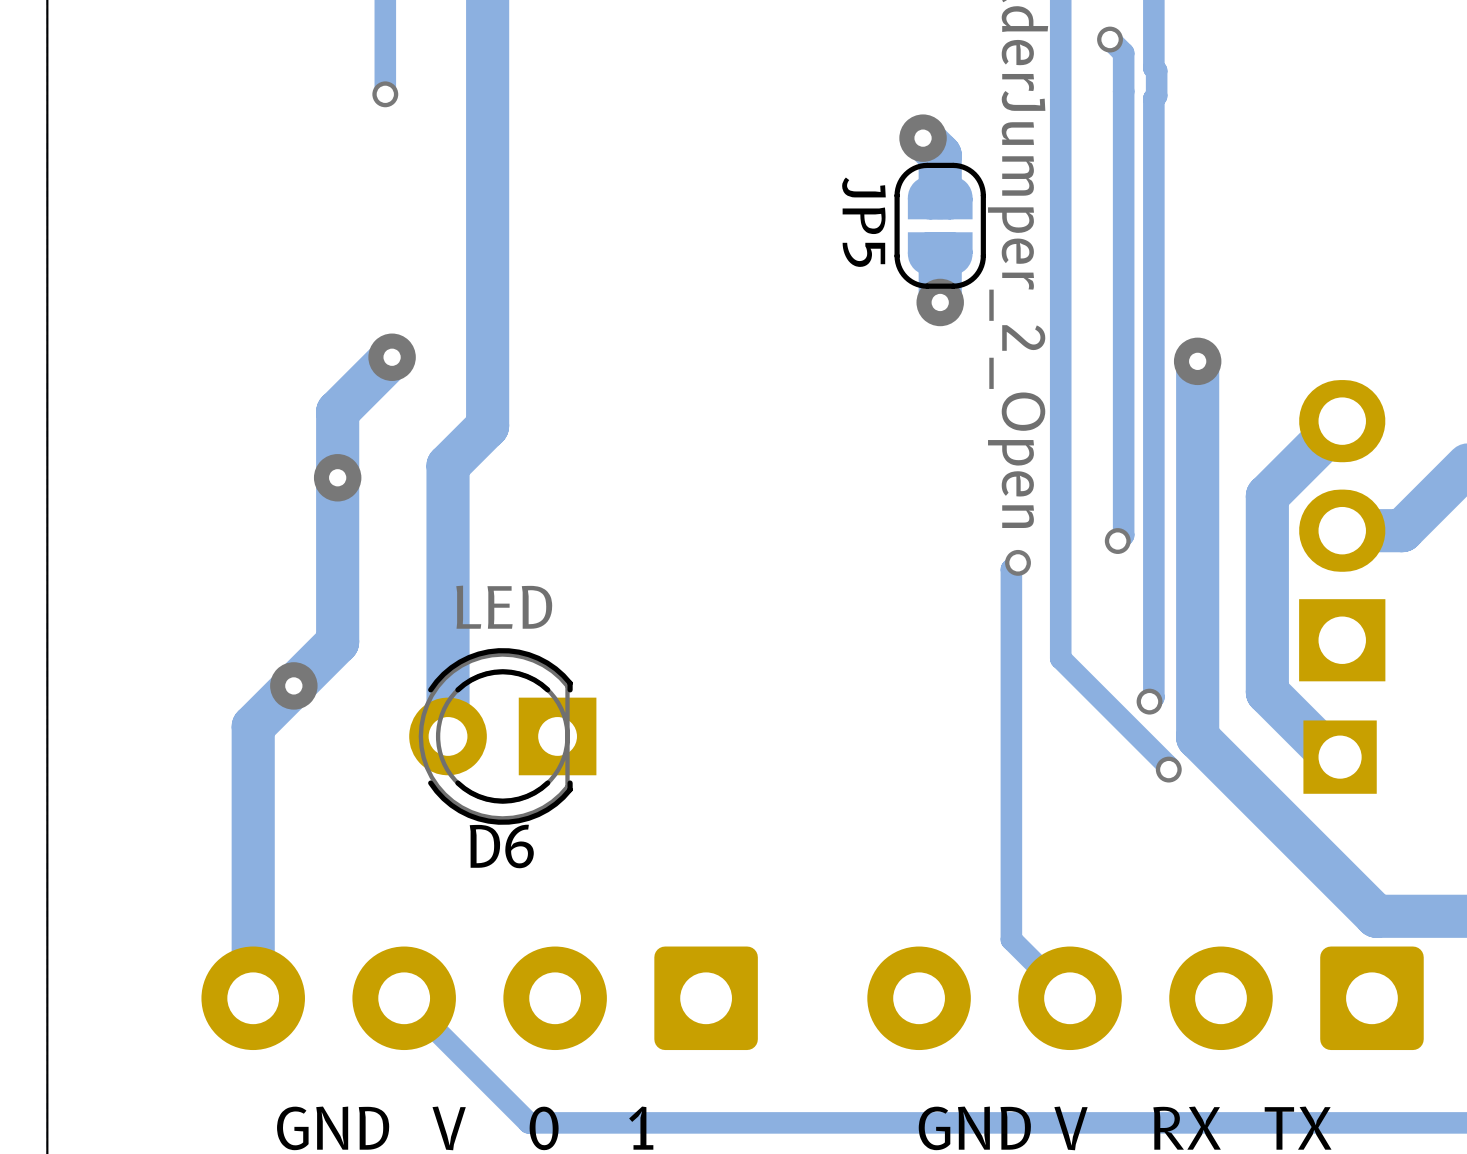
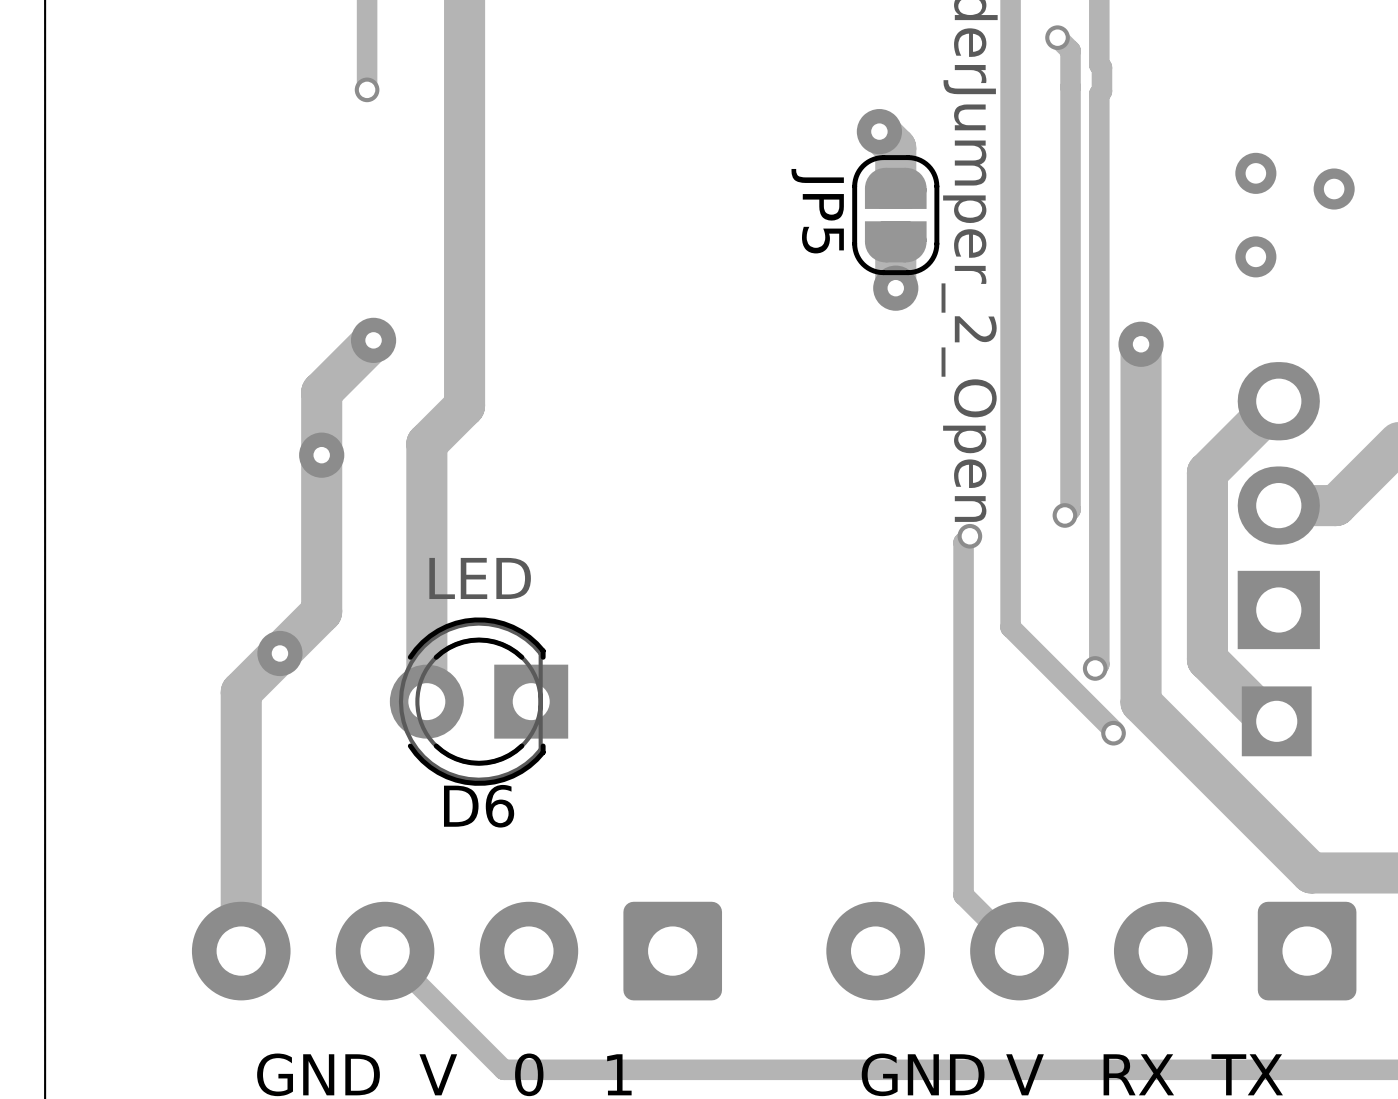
part: none -> (1255, 173)
part: none -> (1334, 189)
part: none -> (1255, 256)

